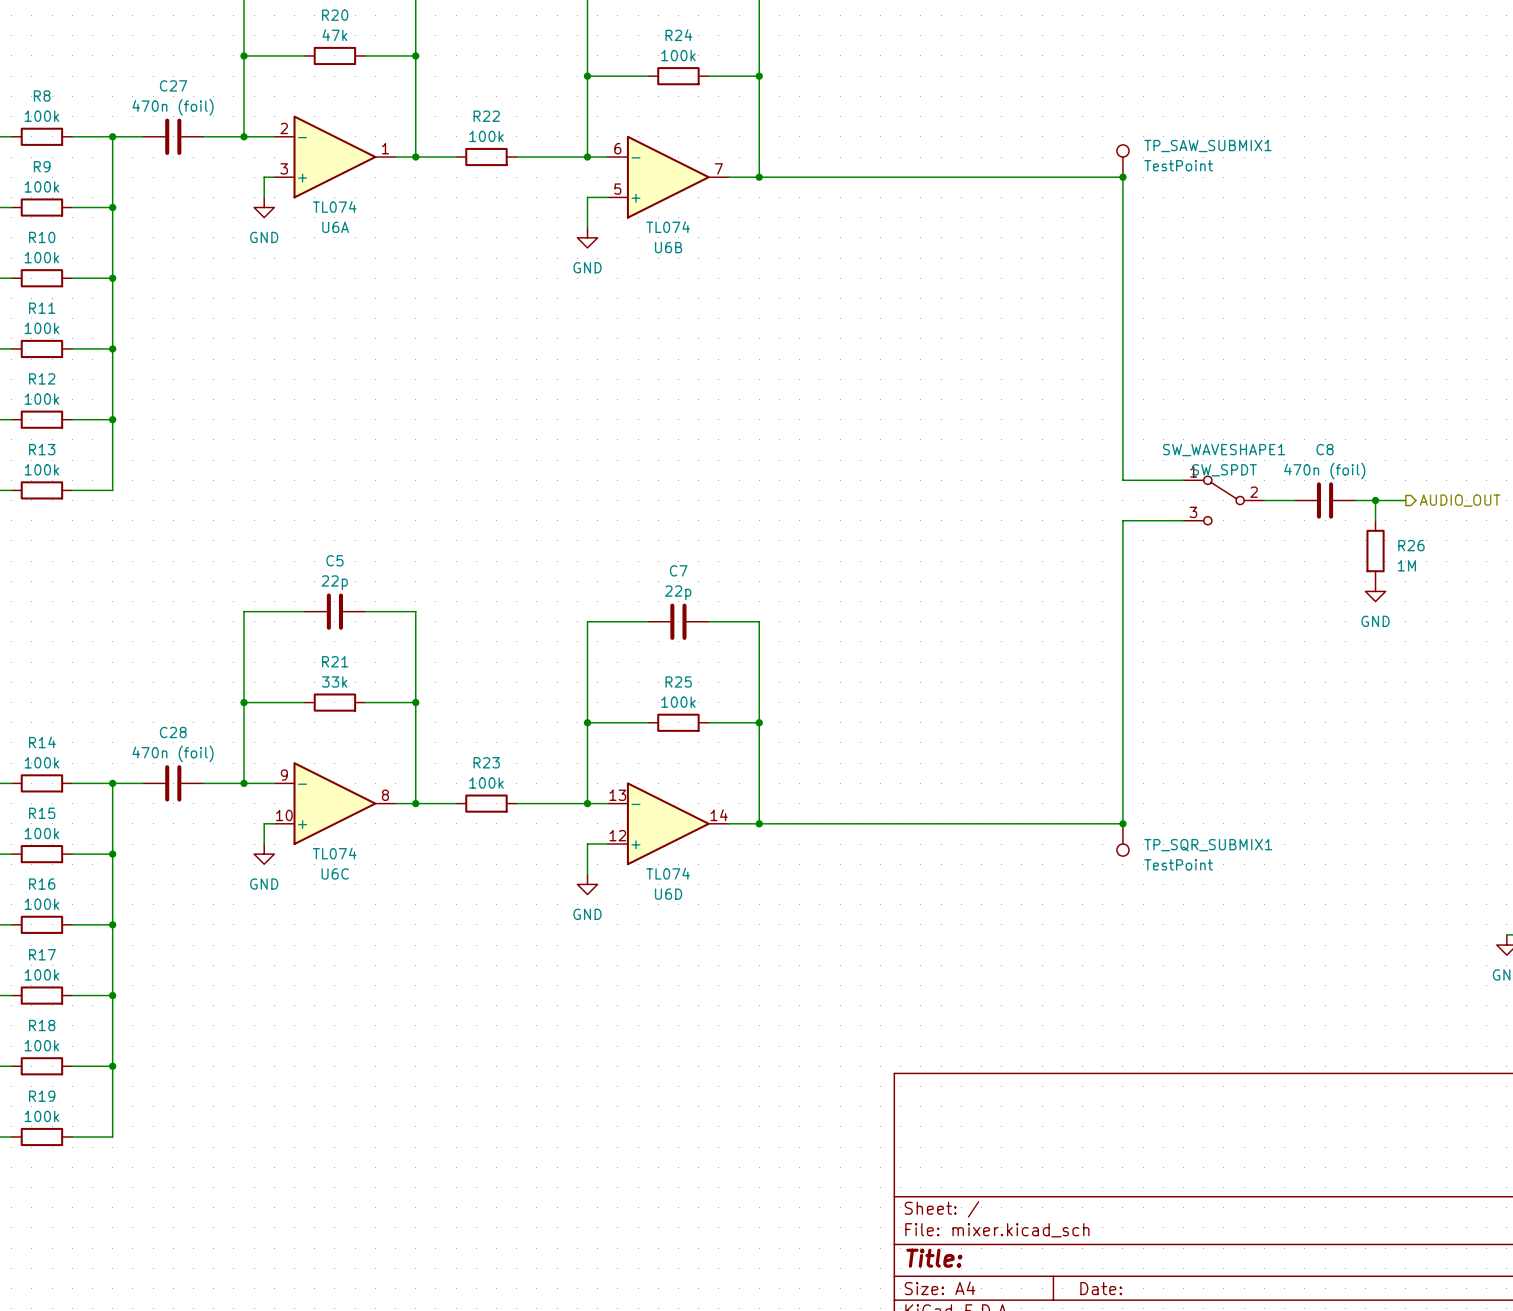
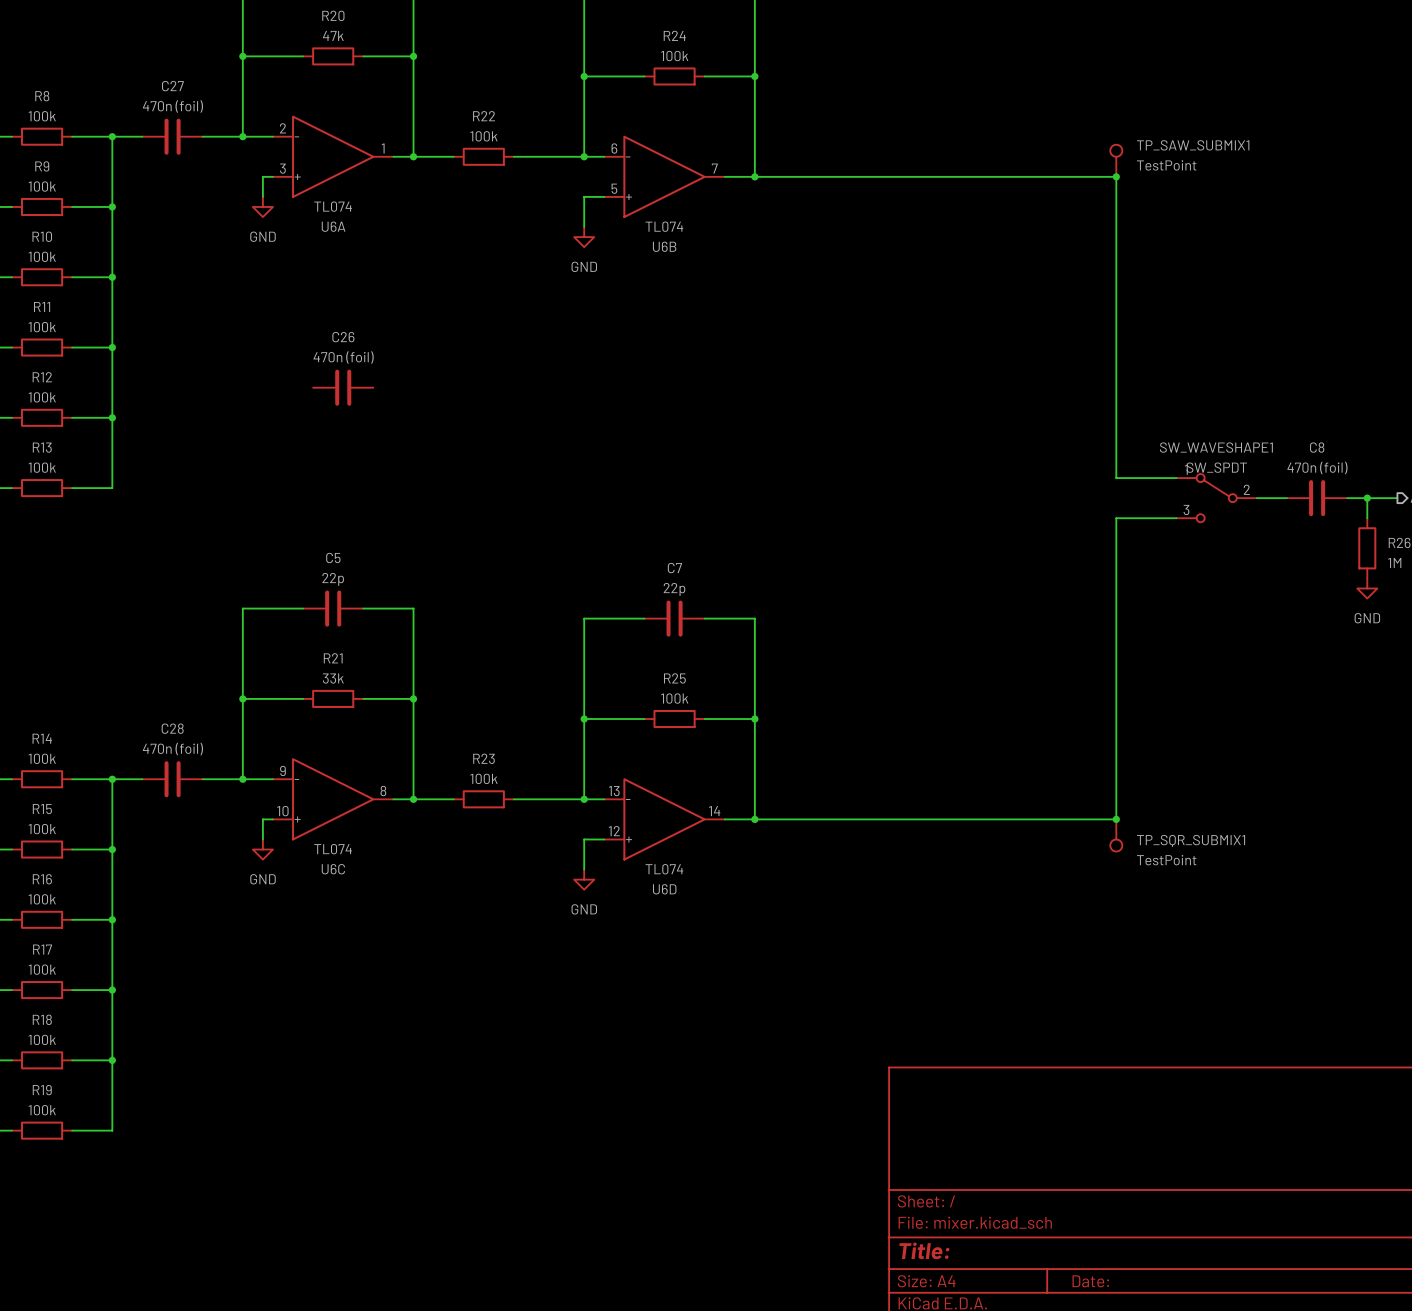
C26: none -> 470n (foil) (343, 387)

